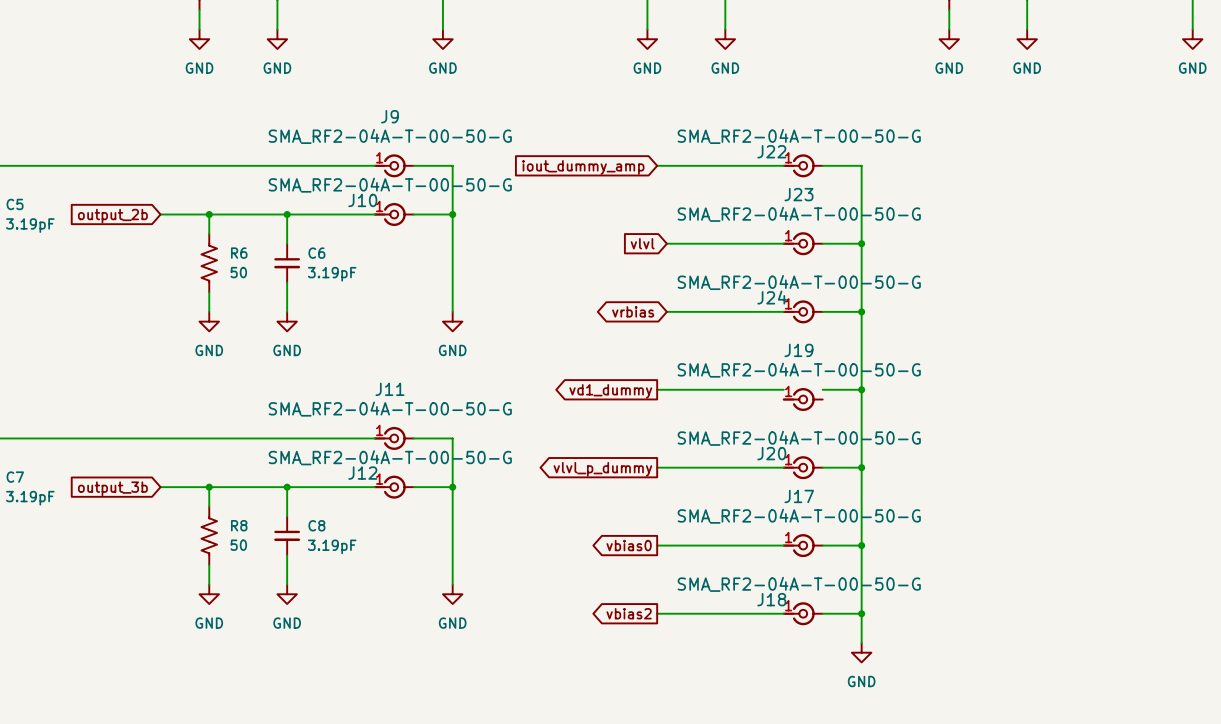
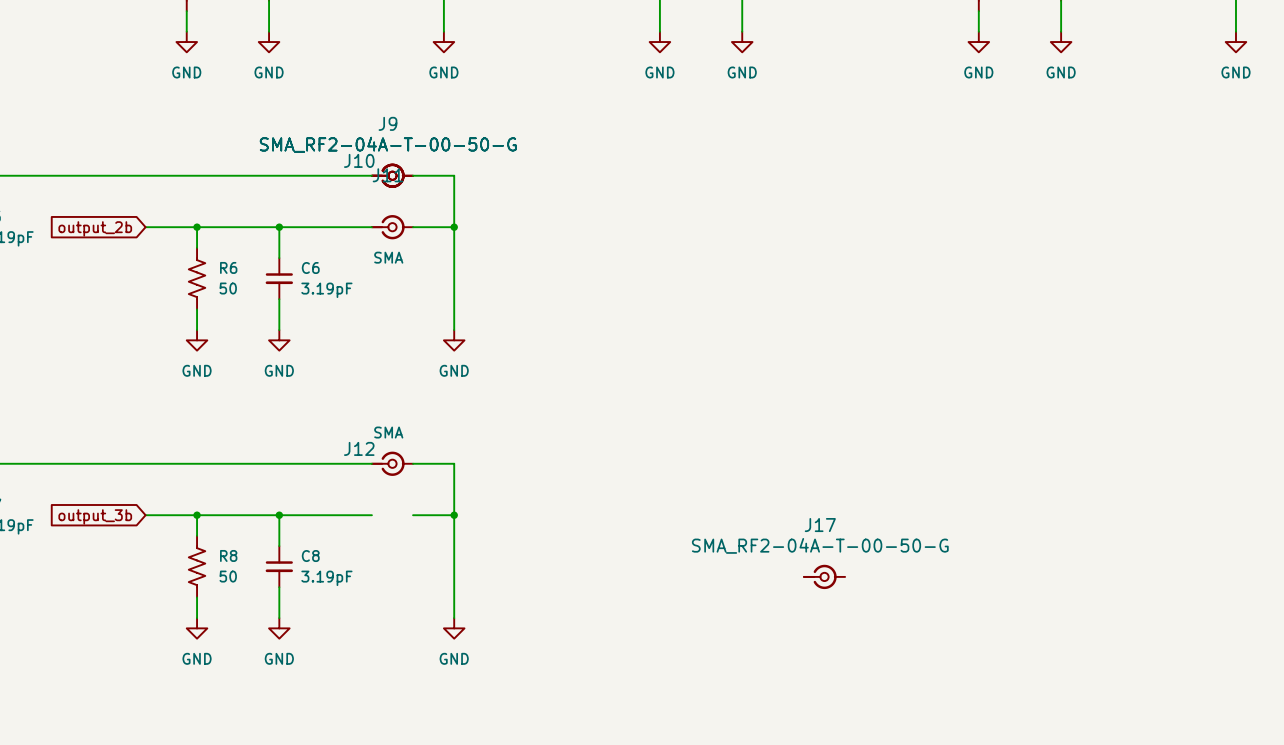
J9 pin number: 1 (379, 157) -> none
wire: (657, 165) (783, 165) -> none
J22: SMA_RF2-04A-T-00-50-G (803, 165) -> none
wire: (822, 165) (861, 165) (861, 642) -> none
global label: iout_dummy_amp (583, 167) -> none
J10 pin number: 1 (379, 206) -> none
J10 position: (394, 214) -> (392, 175)
global label: vlvl (642, 243) -> none
wire: (666, 243) (783, 243) -> none
J23: SMA_RF2-04A-T-00-50-G (803, 243) -> none
wire: (822, 243) (861, 243) -> none
junction: (861, 243) -> none
global label: vrbias (633, 311) -> none
wire: (666, 311) (783, 311) -> none
J24: SMA_RF2-04A-T-00-50-G (803, 311) -> none
wire: (822, 311) (861, 311) -> none
junction: (861, 311) -> none
wire: (657, 389) (783, 389) -> none
wire: (822, 389) (861, 389) -> none
junction: (861, 389) -> none
global label: vd1_dummy (610, 391) -> none
J19: SMA_RF2-04A-T-00-50-G (803, 399) -> none
J11 value: SMA_RF2-04A-T-00-50-G (390, 409) -> SMA (388, 257)
J11 pin number: 1 (379, 430) -> none
J11 position: (394, 438) -> (392, 227)
J12 value: SMA_RF2-04A-T-00-50-G (390, 457) -> SMA (388, 432)
wire: (657, 467) (783, 467) -> none
J20: SMA_RF2-04A-T-00-50-G (803, 467) -> none
wire: (822, 467) (861, 467) -> none
junction: (861, 467) -> none
global label: vlvl_p_dummy (602, 469) -> none
J12 pin number: 1 (379, 479) -> none
J12 position: (394, 487) -> (392, 463)
J17 pin number: 1 (788, 537) -> none
global label: vbias0 (629, 545) -> none
wire: (657, 545) (783, 545) -> none
wire: (822, 545) (861, 545) -> none
junction: (861, 545) -> none
global label: vbias2 (629, 613) -> none
wire: (657, 613) (783, 613) -> none
J18: SMA_RF2-04A-T-00-50-G (803, 613) -> none
wire: (822, 613) (861, 613) -> none
junction: (861, 613) -> none
power symbol: GND (861, 652) -> none

